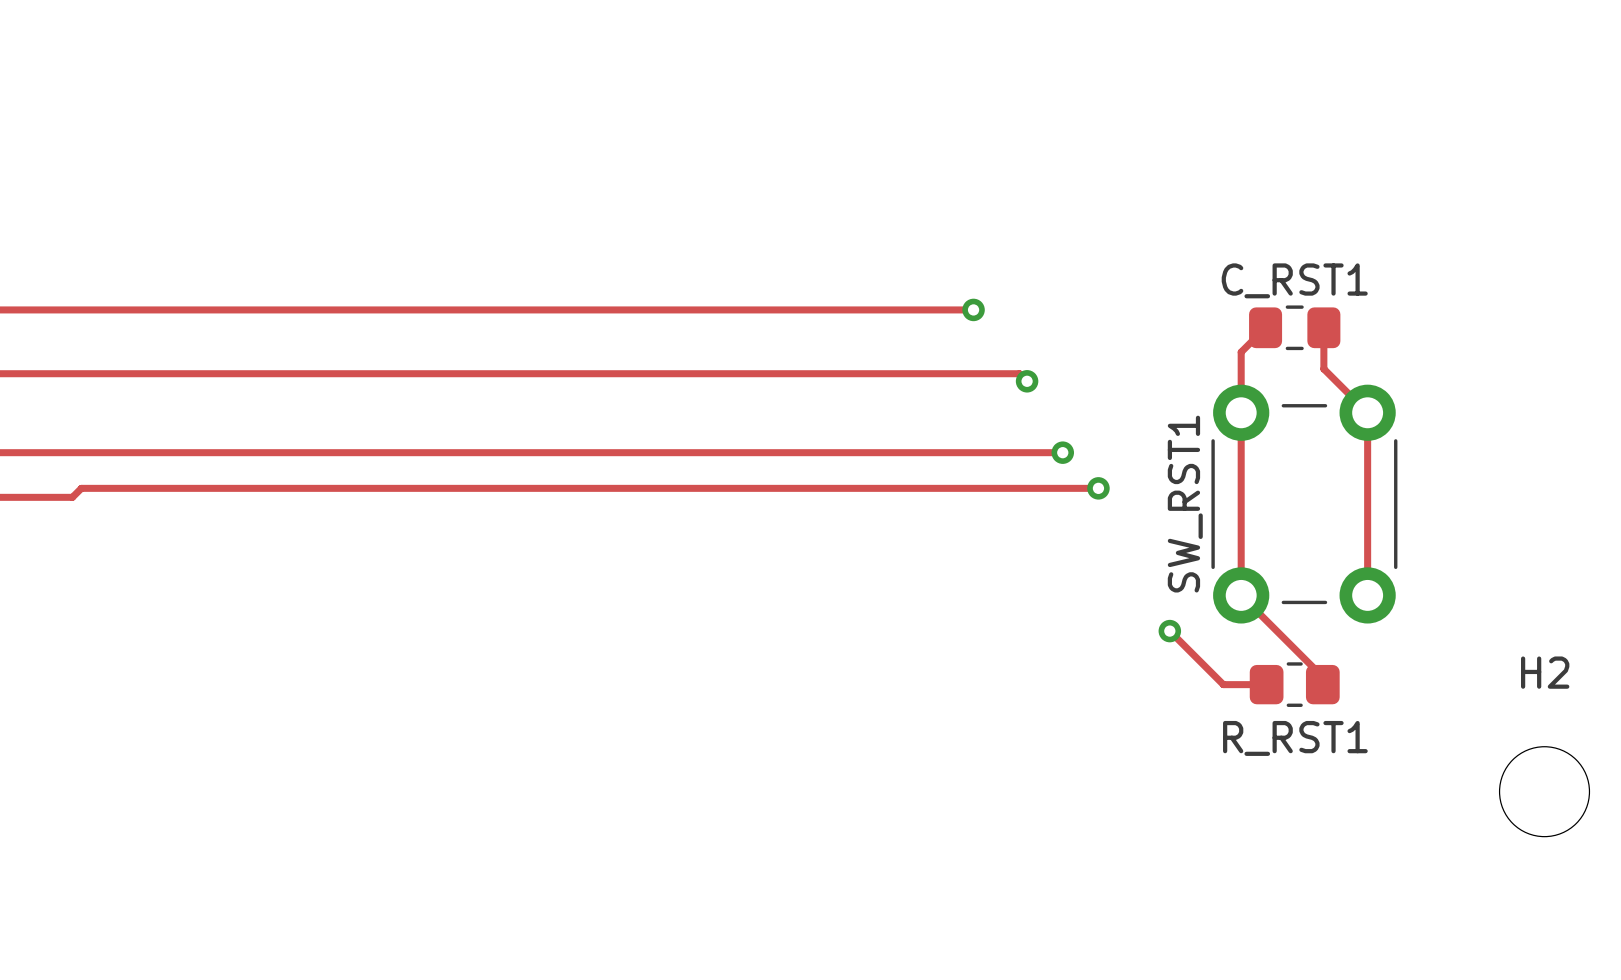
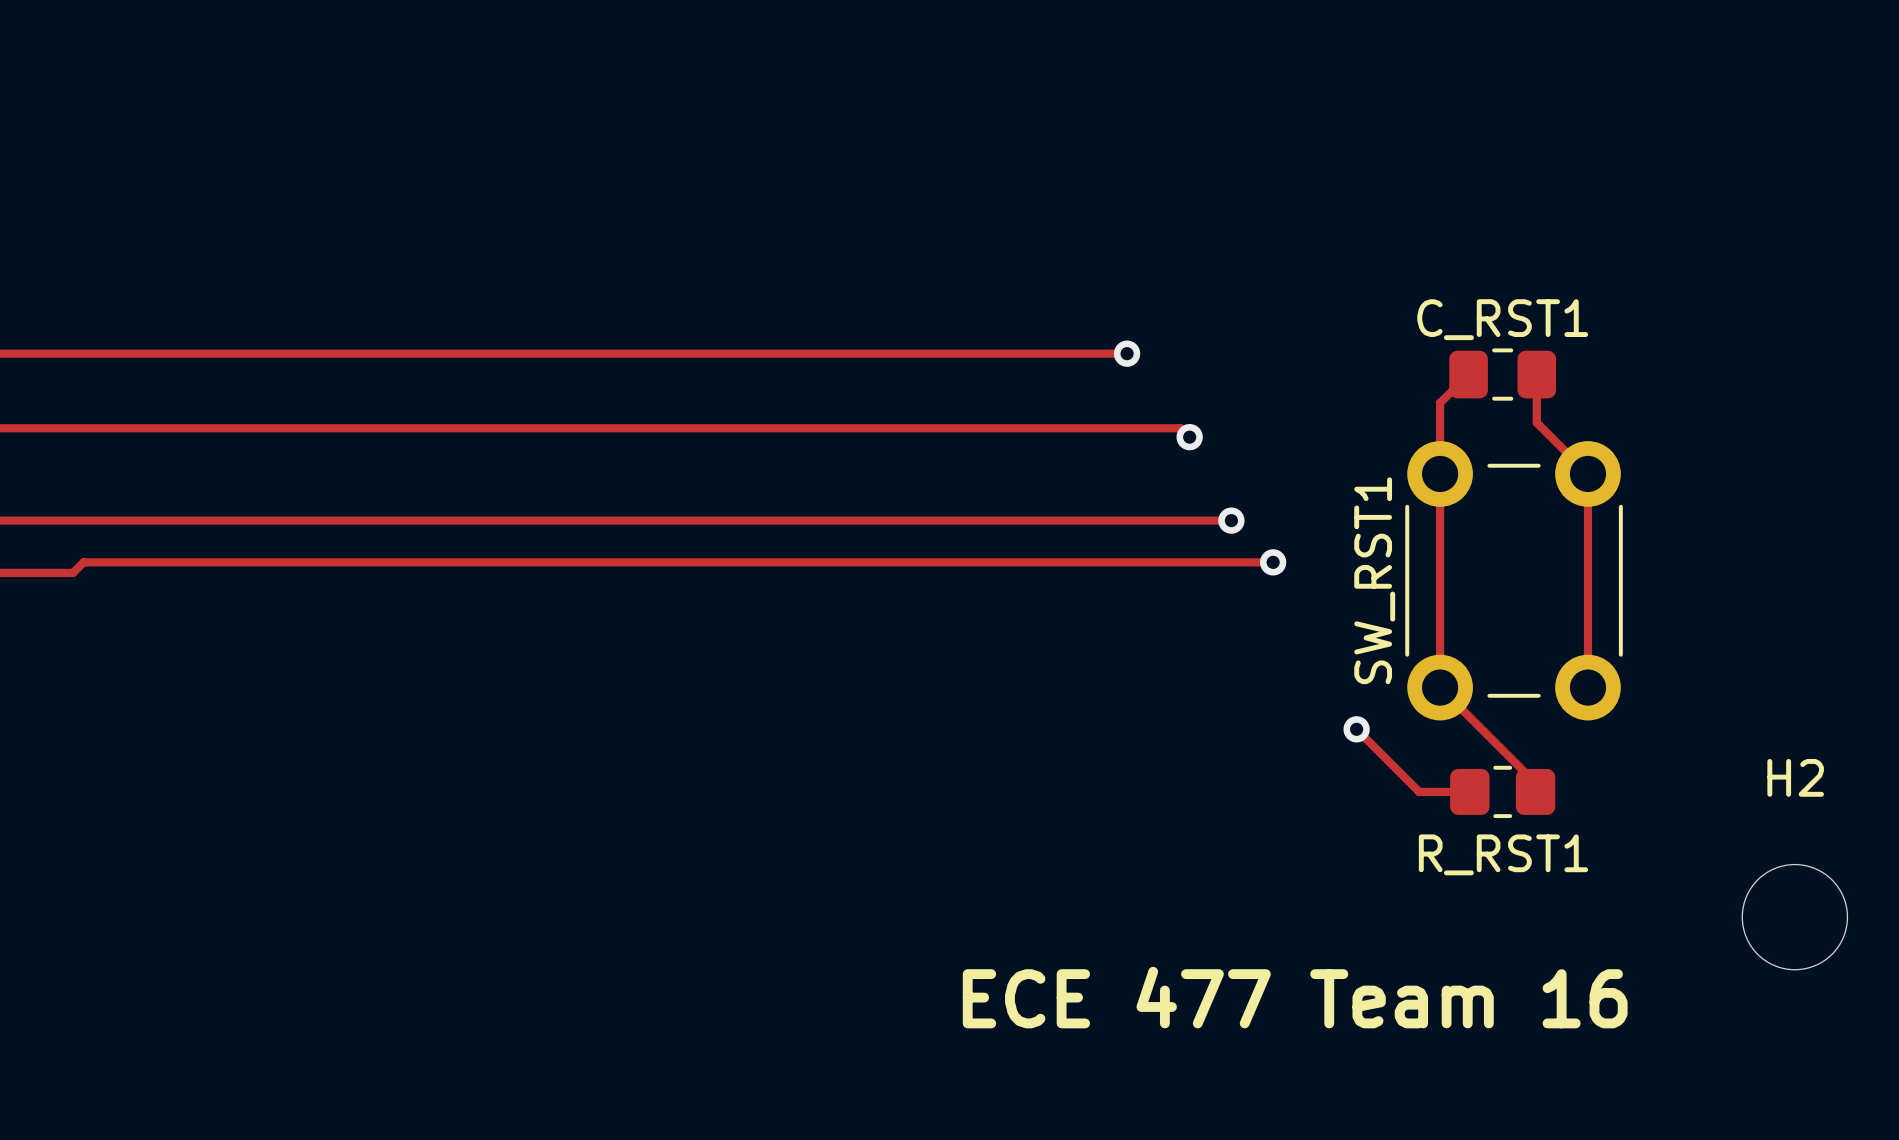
text: none -> ECE 477 Team 16 (1295, 997)

